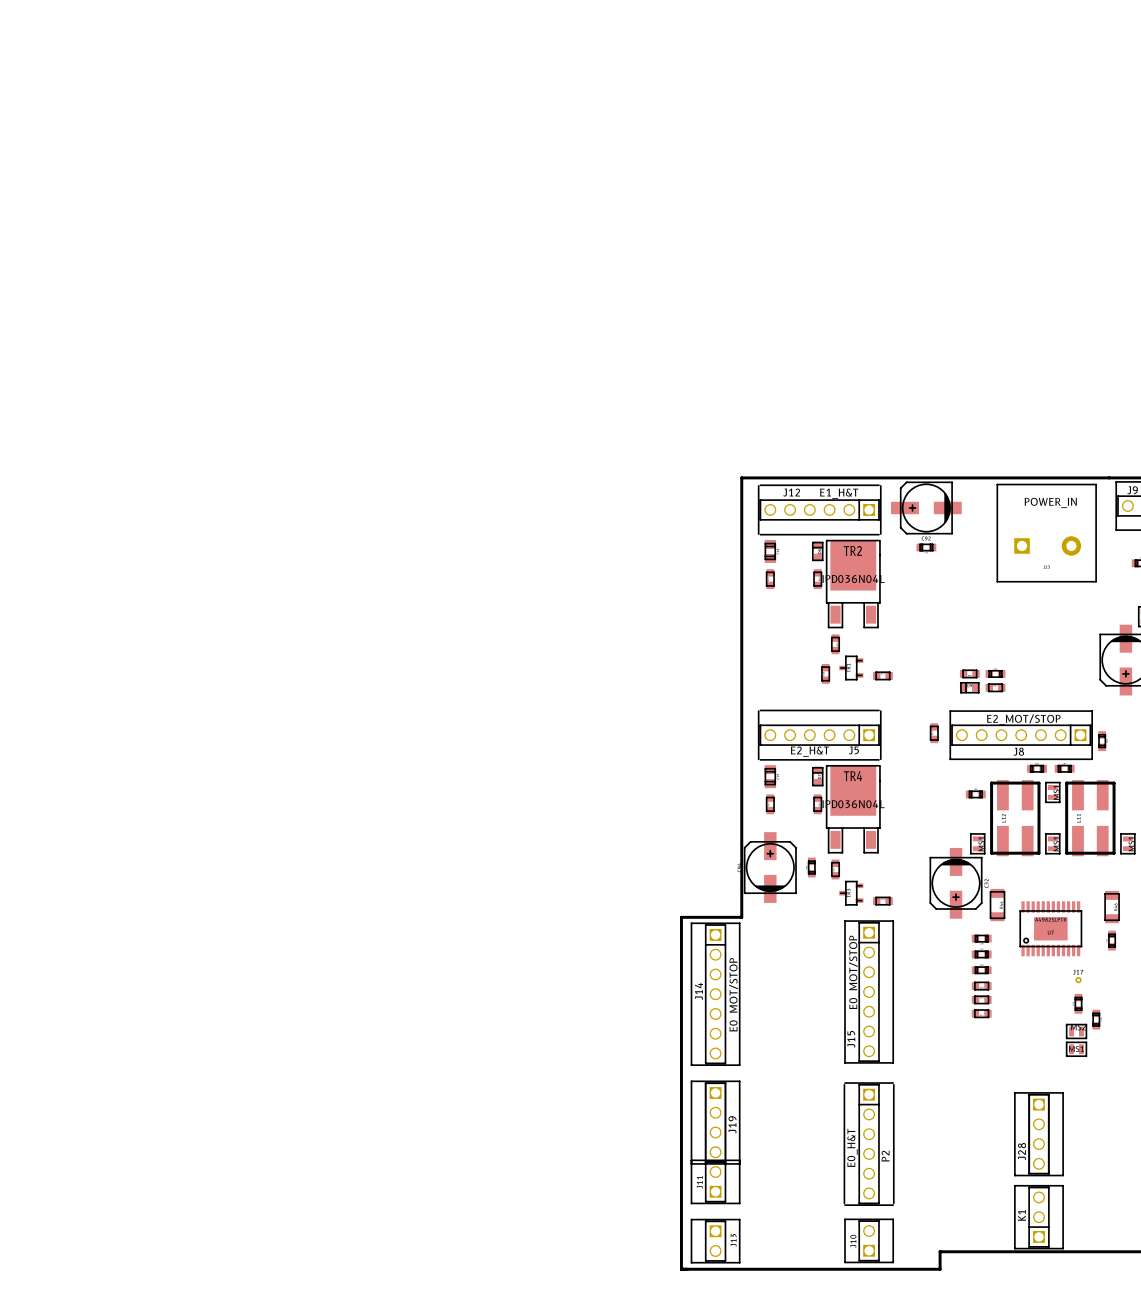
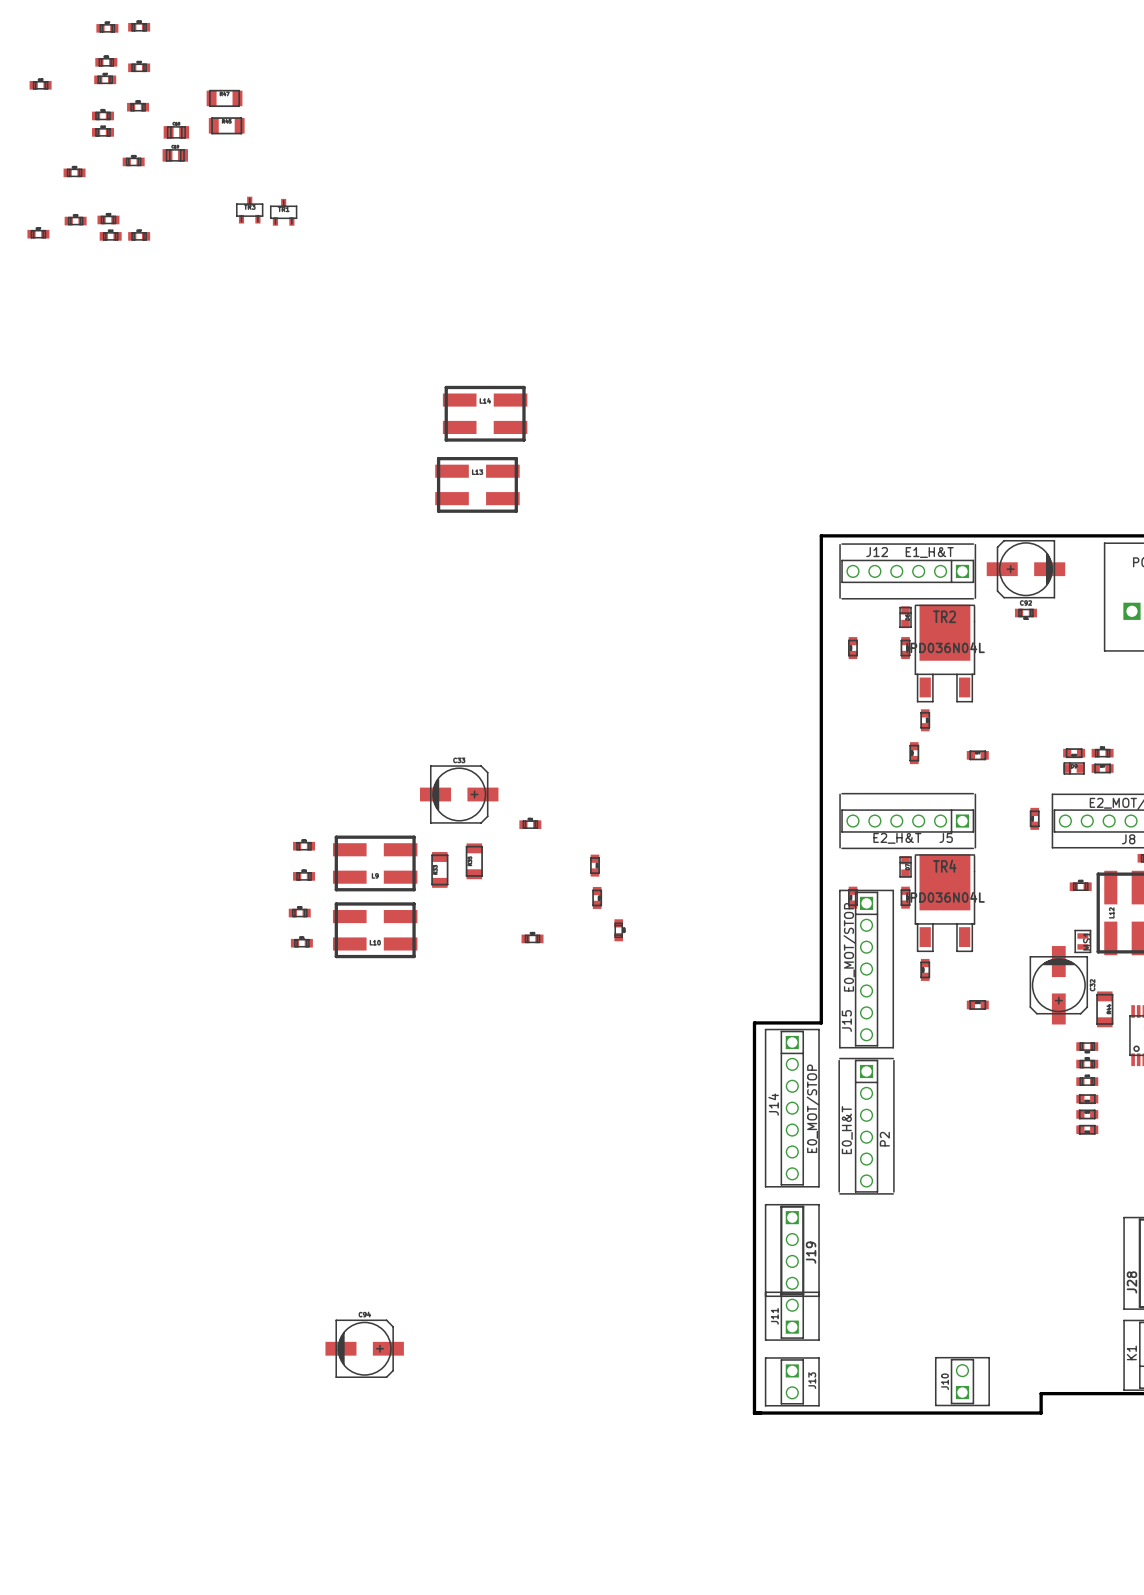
part: none -> (139, 27)
part: none -> (107, 28)
part: none -> (106, 62)
part: none -> (139, 67)
part: none -> (105, 79)
part: none -> (224, 98)
part: none -> (138, 107)
part: none -> (103, 115)
part: none -> (226, 125)
part: none -> (103, 132)
part: none -> (133, 161)
part: none -> (74, 172)
part: none -> (108, 219)
part: none -> (75, 221)
part: none -> (38, 234)
part: none -> (110, 236)
part: none -> (139, 236)
part: none -> (485, 413)
part: none -> (477, 484)
part rotation: 0° (770, 551) -> 90° counterclockwise (176, 132)
part position: (770, 551) -> (176, 132)
part rotation: 0° (851, 668) -> 90° clockwise (283, 212)
part position: (851, 668) -> (283, 212)
part: none -> (459, 794)
part: none -> (530, 824)
part: none -> (304, 846)
part: none -> (474, 861)
part: none -> (375, 863)
part: none -> (595, 865)
part rotation: 0° (770, 776) -> 90° counterclockwise (175, 155)
part position: (770, 776) -> (175, 155)
part: none -> (439, 869)
part: none -> (304, 876)
part: none -> (597, 897)
part: none -> (299, 913)
part: none -> (375, 930)
part: none -> (618, 930)
part: none -> (532, 938)
part: none -> (301, 943)
part rotation: 0° (770, 867) -> 90° clockwise (364, 1348)
part position: (770, 867) -> (364, 1348)
part rotation: 0° (811, 867) -> 90° clockwise (40, 85)
part position: (811, 867) -> (40, 85)
part rotation: 0° (851, 893) -> 90° clockwise (249, 210)
part position: (851, 893) -> (249, 210)
J15 position: (869, 991) -> (866, 969)
P2 position: (869, 1144) -> (866, 1126)

